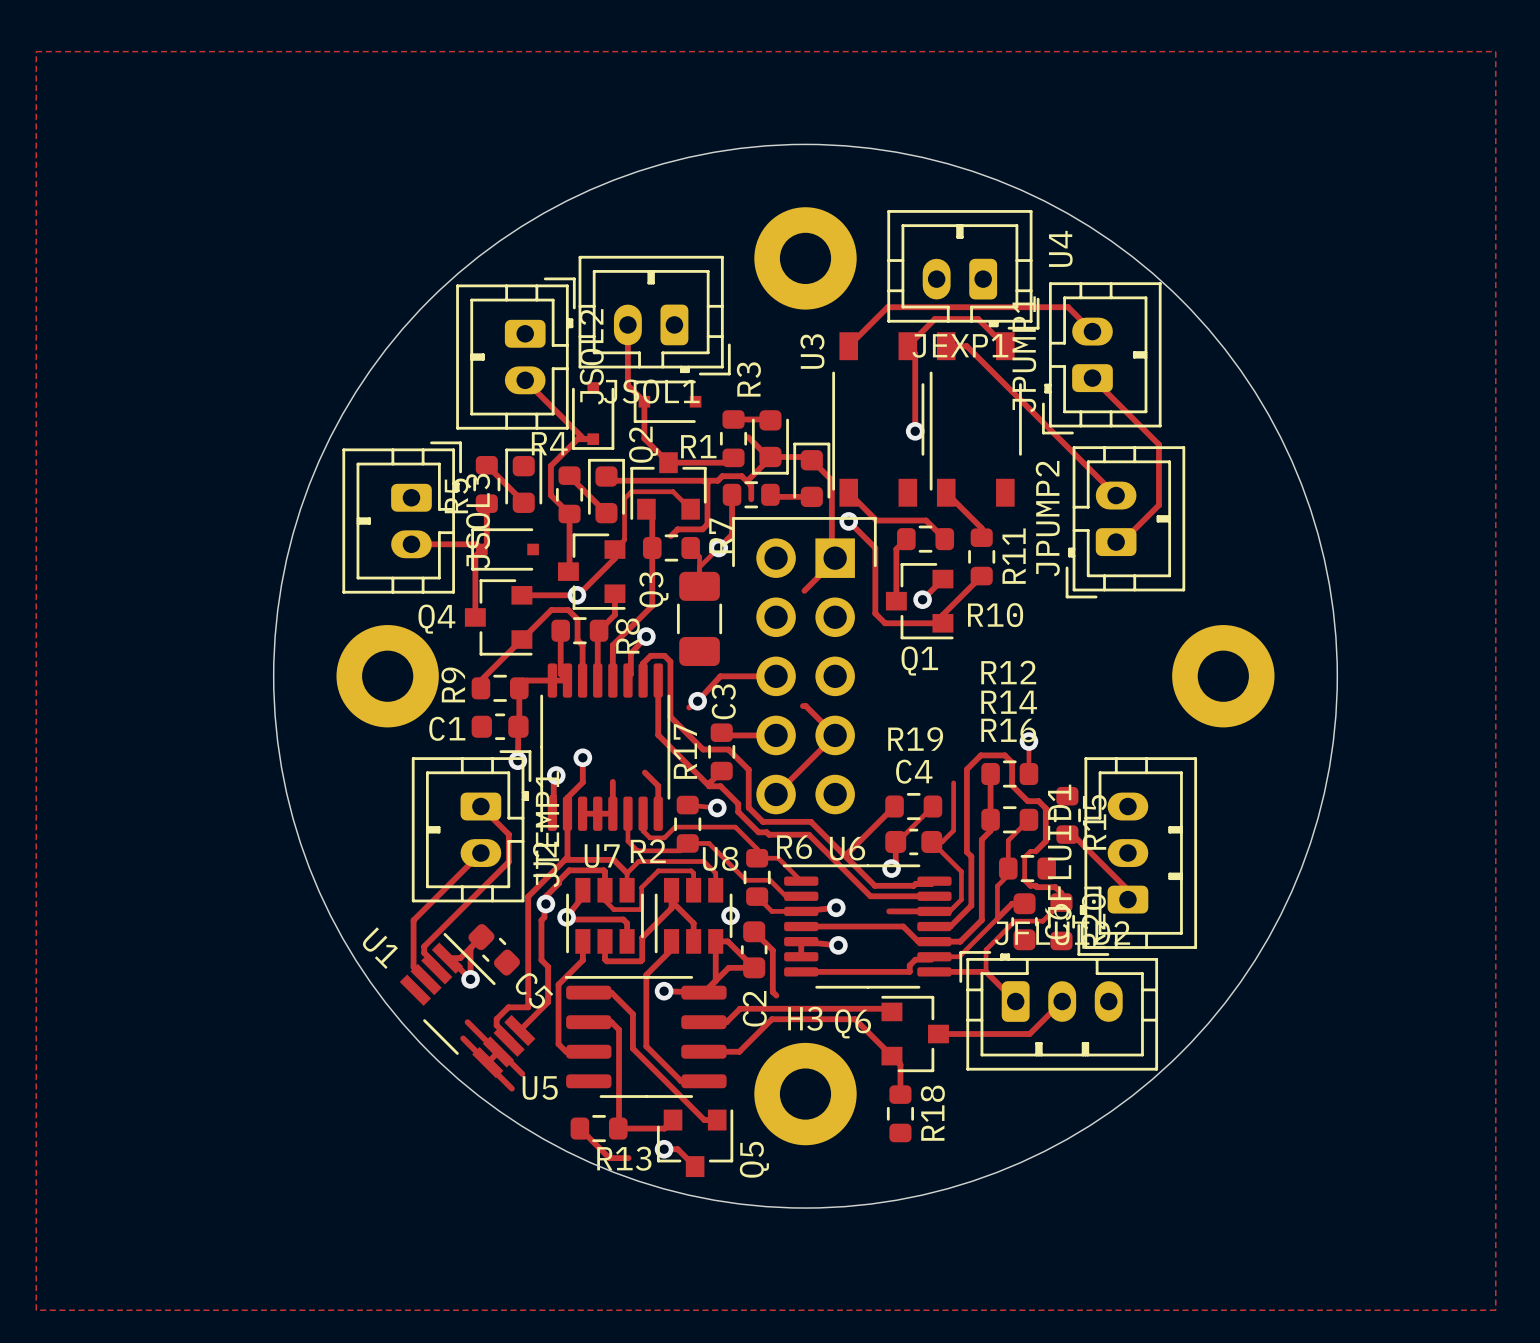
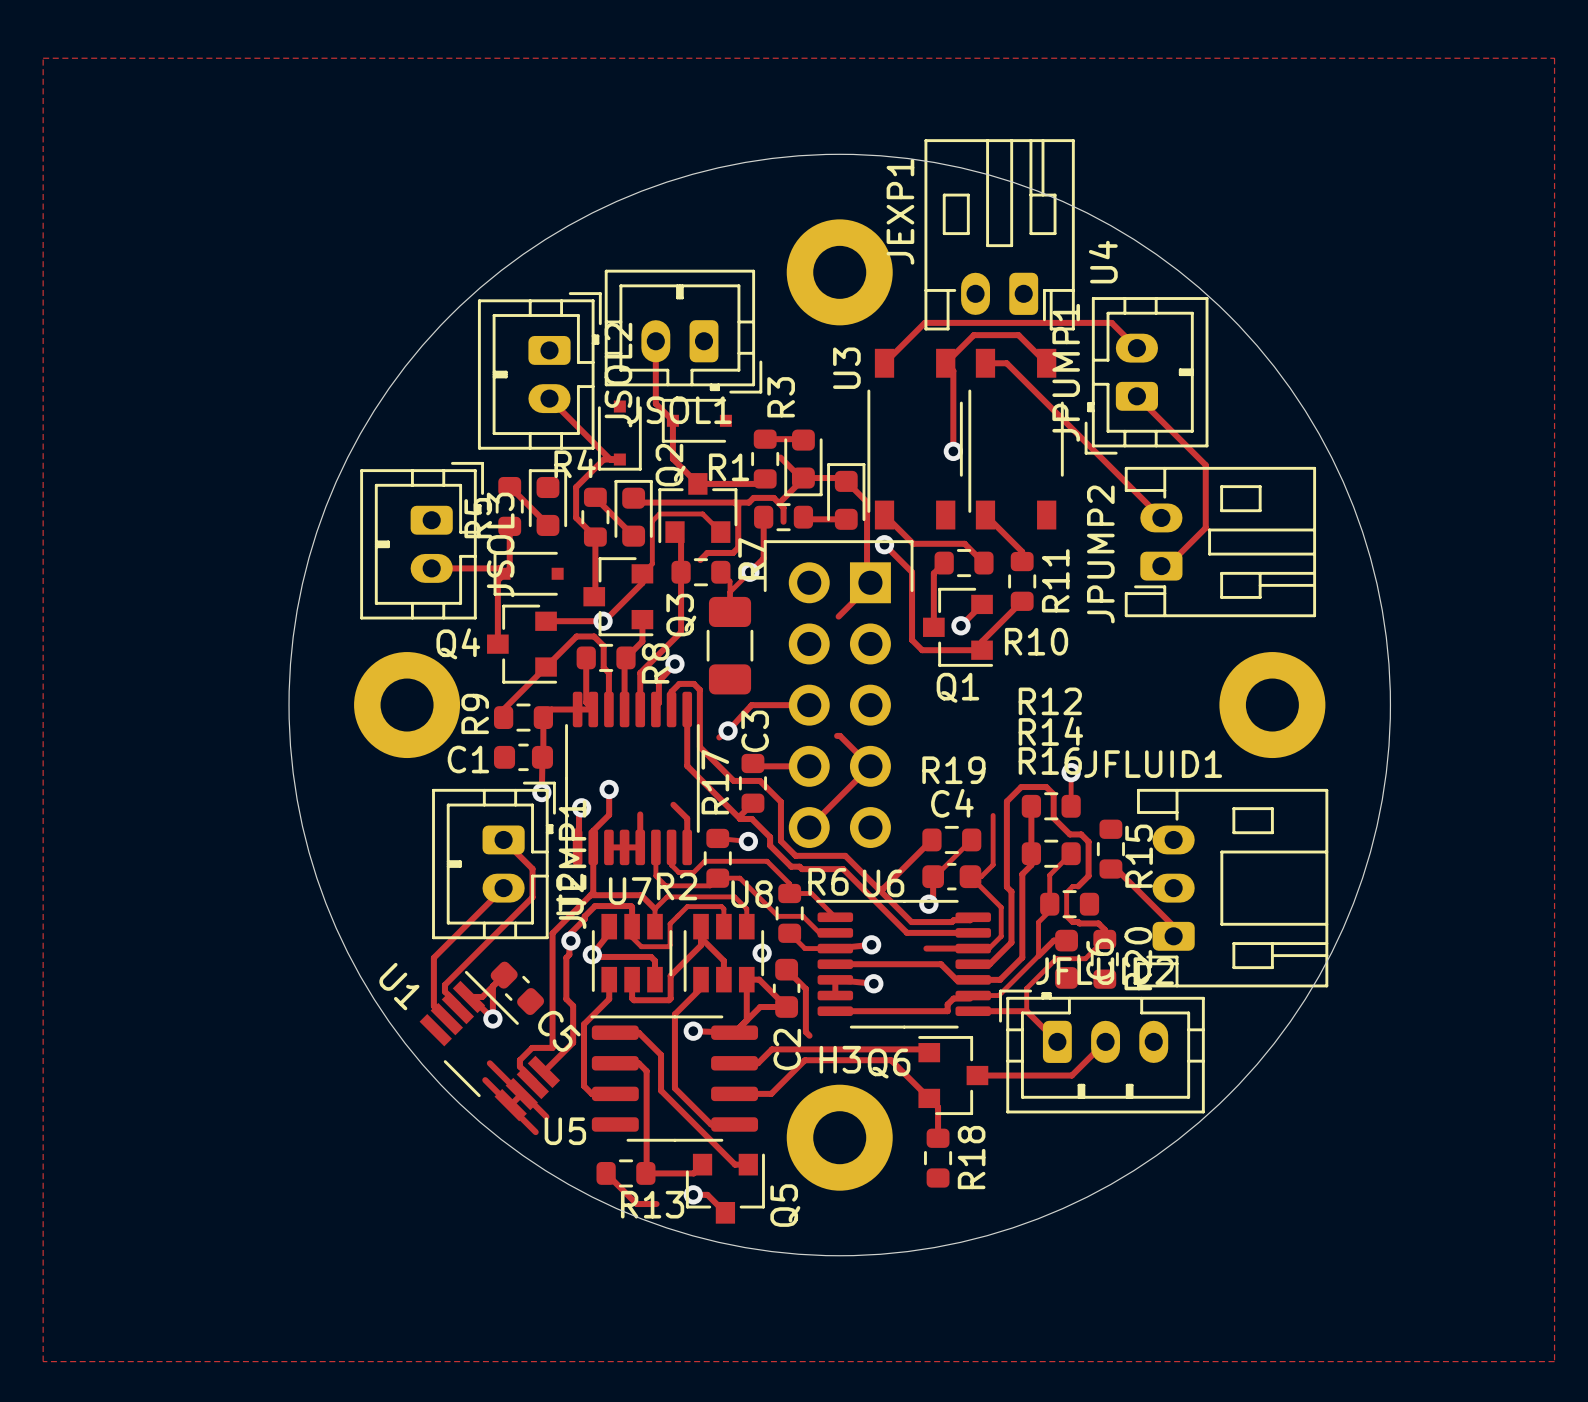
JEXP1 footprint: [887, 210, 1040, 330] -> [924, 139, 1075, 331]
JEXP1 name position: JEXP1 (960, 345) -> JEXP1 (900, 211)
JPUMP2 footprint: [1065, 446, 1186, 599] -> [1124, 466, 1317, 618]
JFLUID1 footprint: [1077, 757, 1198, 956] -> [1137, 788, 1329, 988]
JFLUID1 name position: JFLUID1 (1059, 852) -> JFLUID1 (1153, 764)

